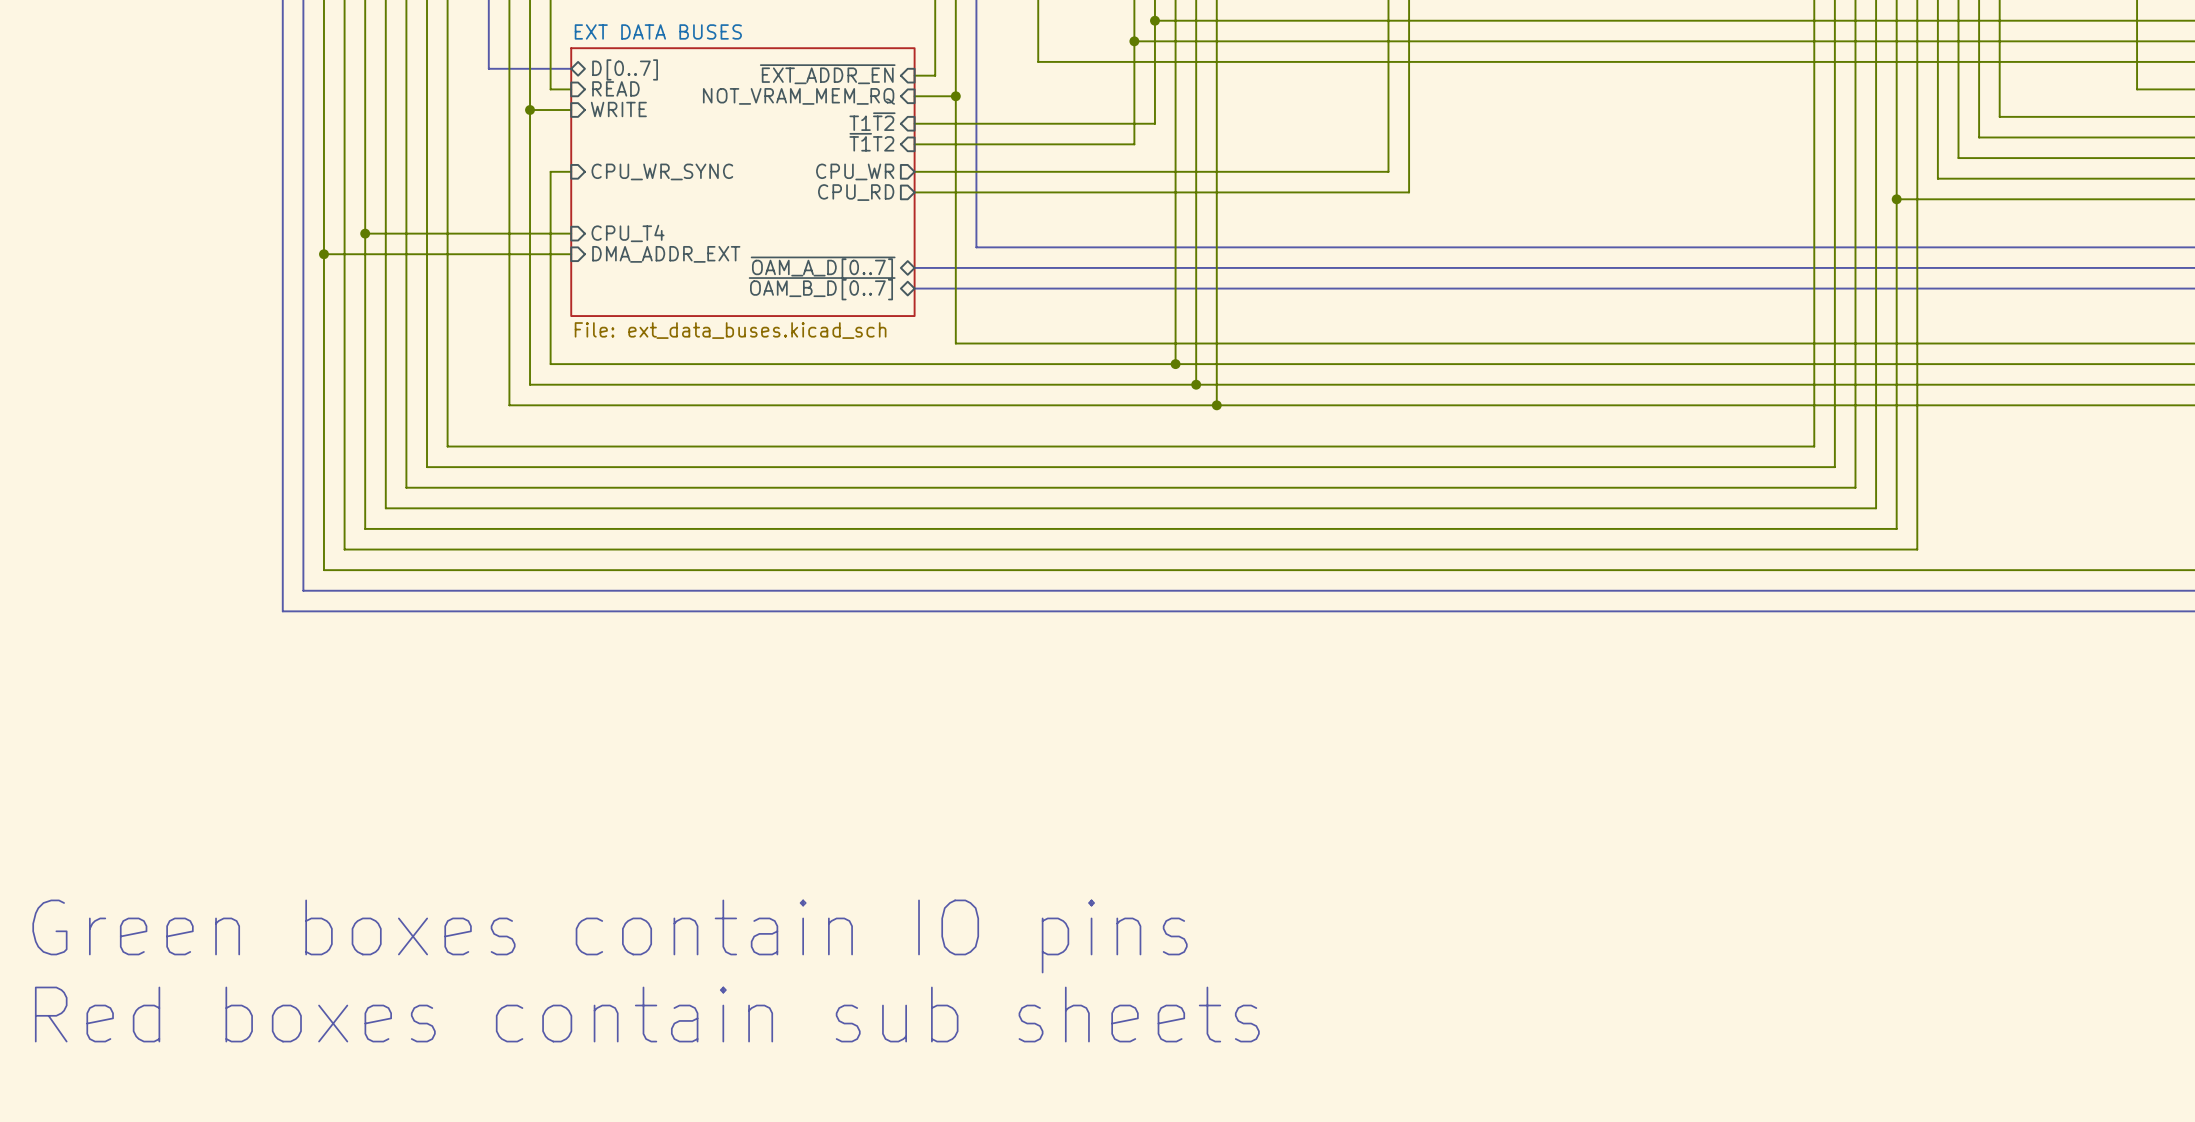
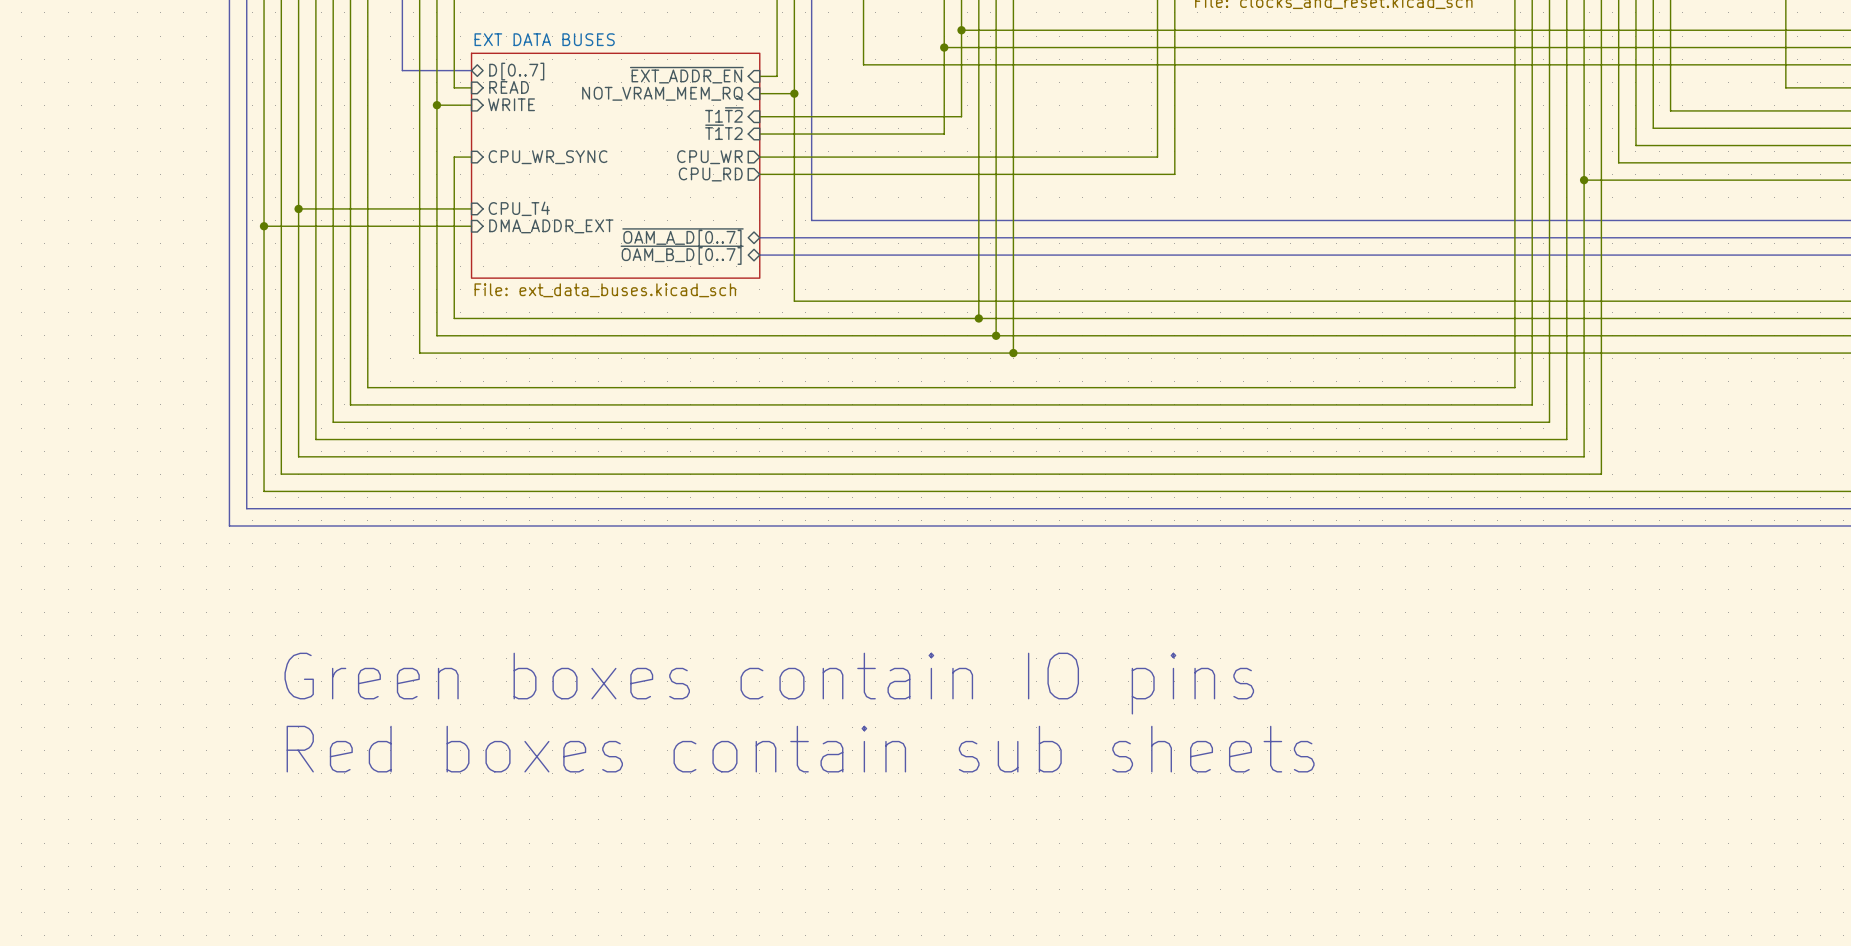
text: none -> Green boxes contain IO pins (769, 683)
text: none -> Red boxes contain sub sheets (800, 749)
text: Green boxes contain IO pins (610, 936) -> none
text: Red boxes contain sub sheets (647, 1014) -> none

